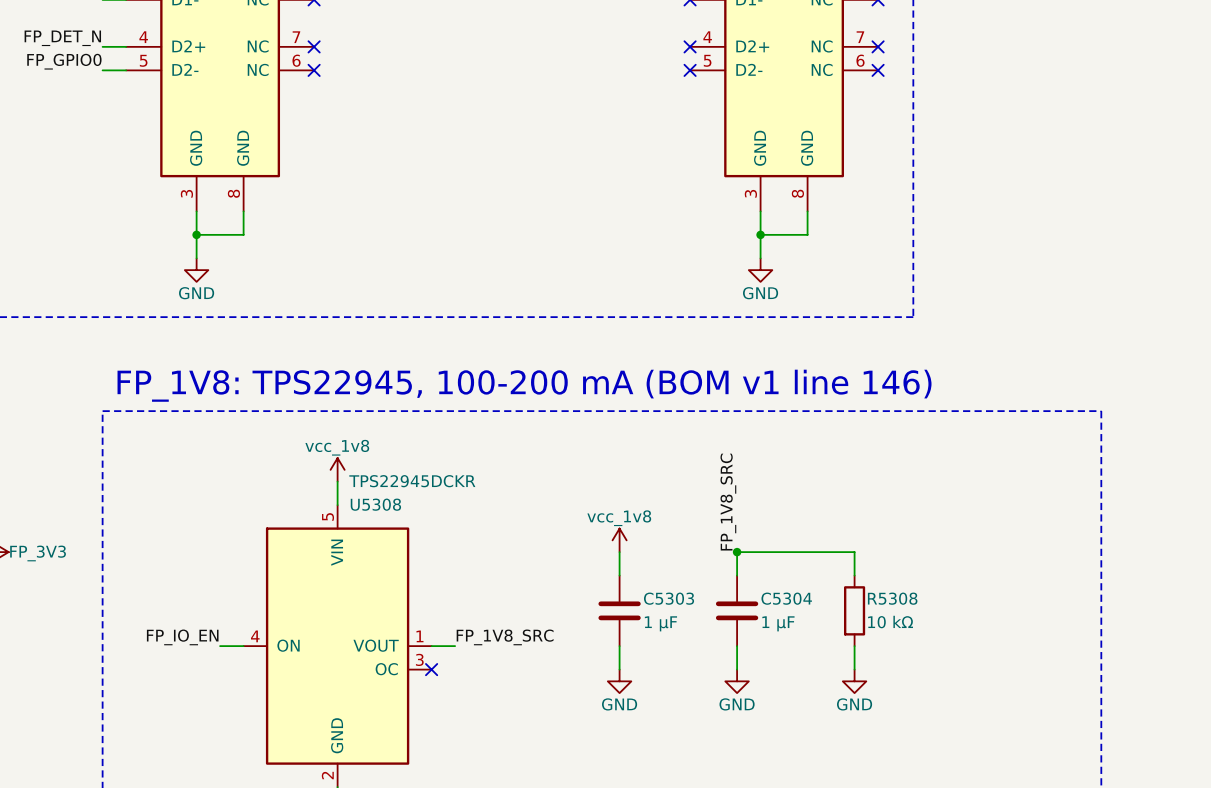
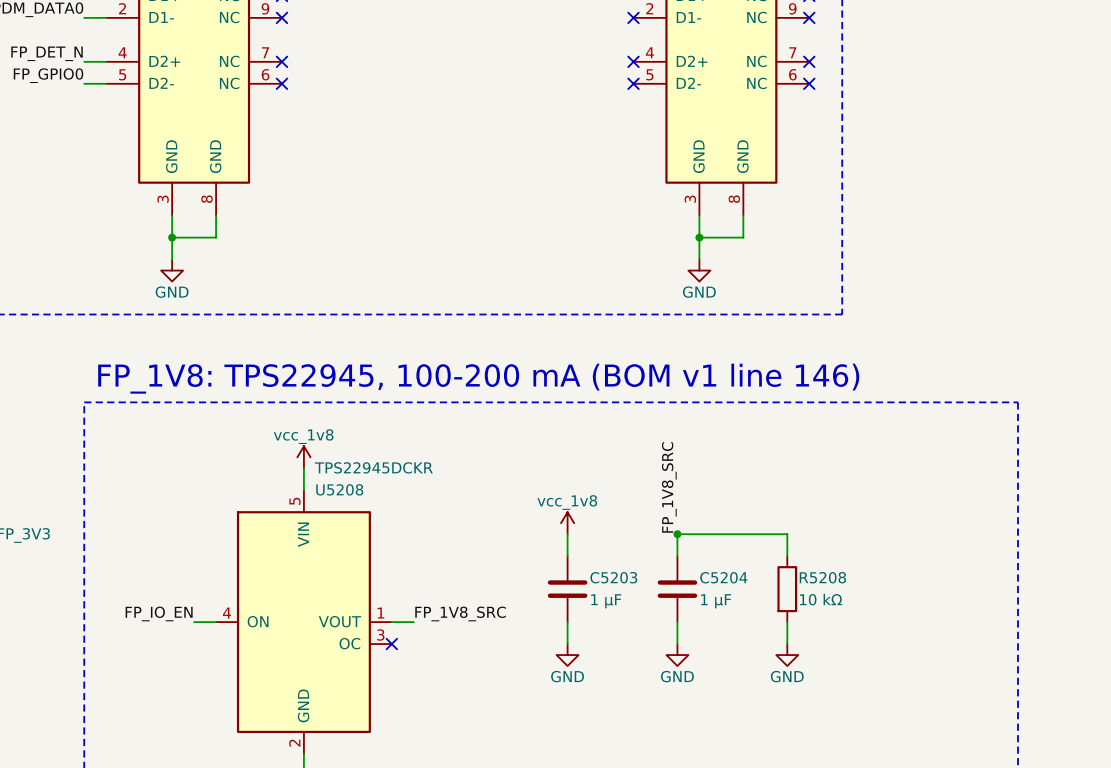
U5308 name: U5308 (375, 504) -> U5208 (339, 489)
C5303 name: C5303 (669, 598) -> C5203 (613, 577)
C5304 name: C5304 (786, 598) -> C5204 (723, 577)
R5308 name: R5308 (892, 598) -> R5208 (822, 577)

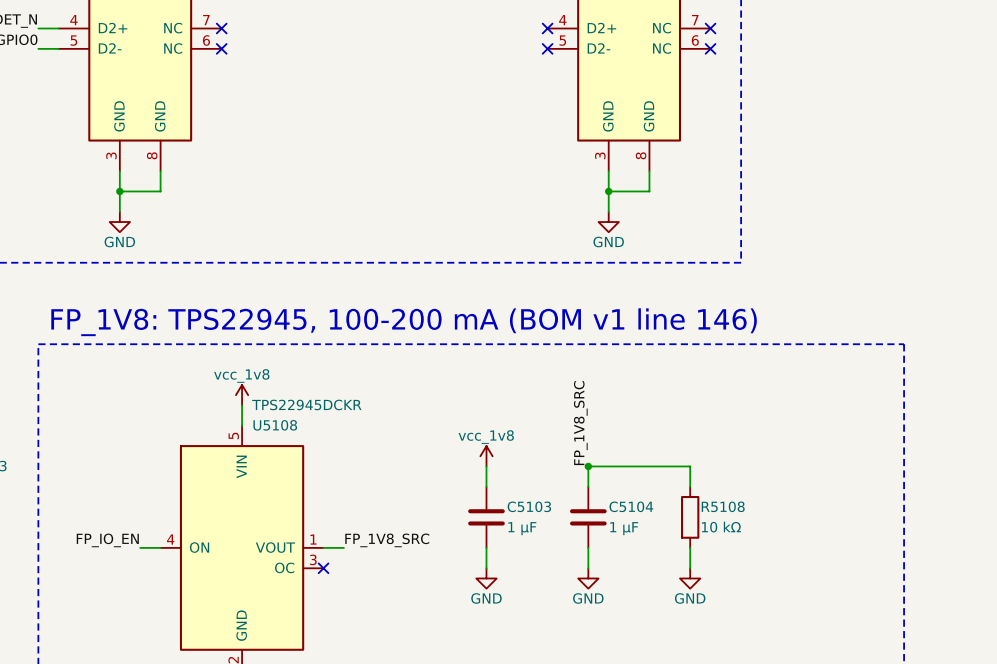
U5208 name: U5208 (339, 489) -> U5108 (275, 425)
C5203 name: C5203 (613, 577) -> C5103 (529, 506)
C5204 name: C5204 (723, 577) -> C5104 (631, 506)
R5208 name: R5208 (822, 577) -> R5108 (723, 506)

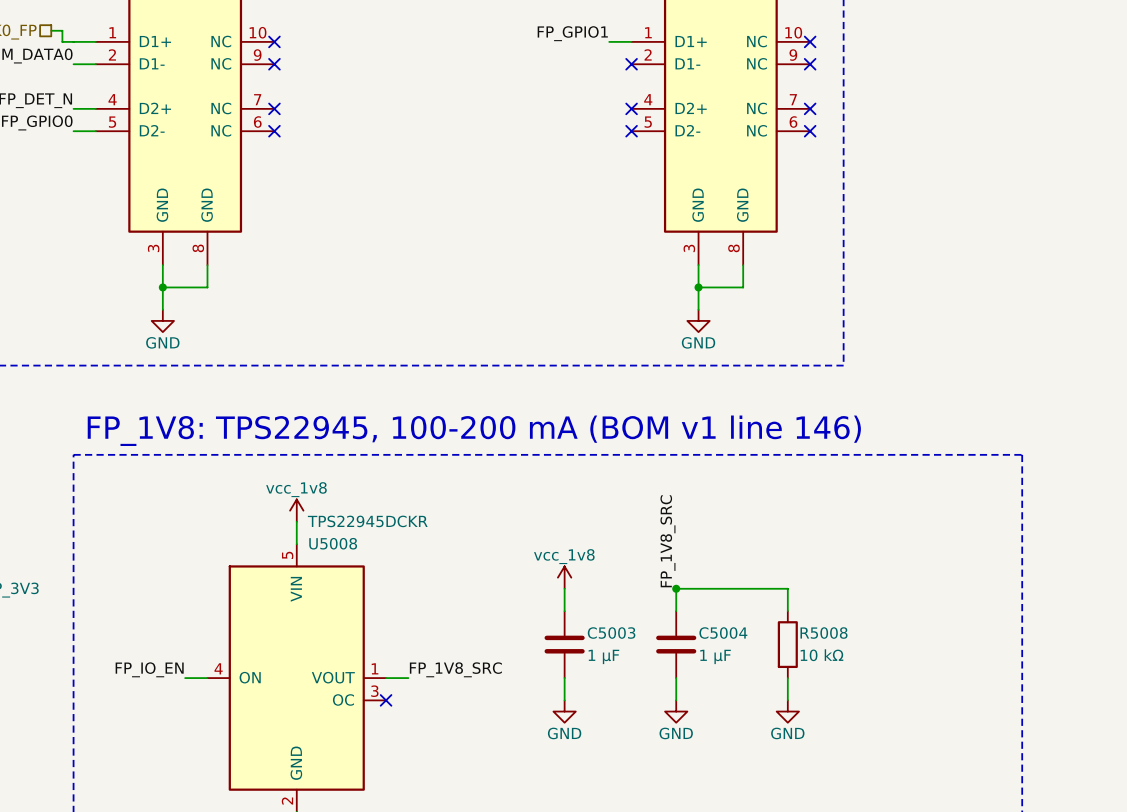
U5108 name: U5108 (275, 425) -> U5008 (333, 543)
C5103 name: C5103 (529, 506) -> C5003 (611, 633)
C5104 name: C5104 (631, 506) -> C5004 (723, 633)
R5108 name: R5108 (723, 506) -> R5008 (824, 633)

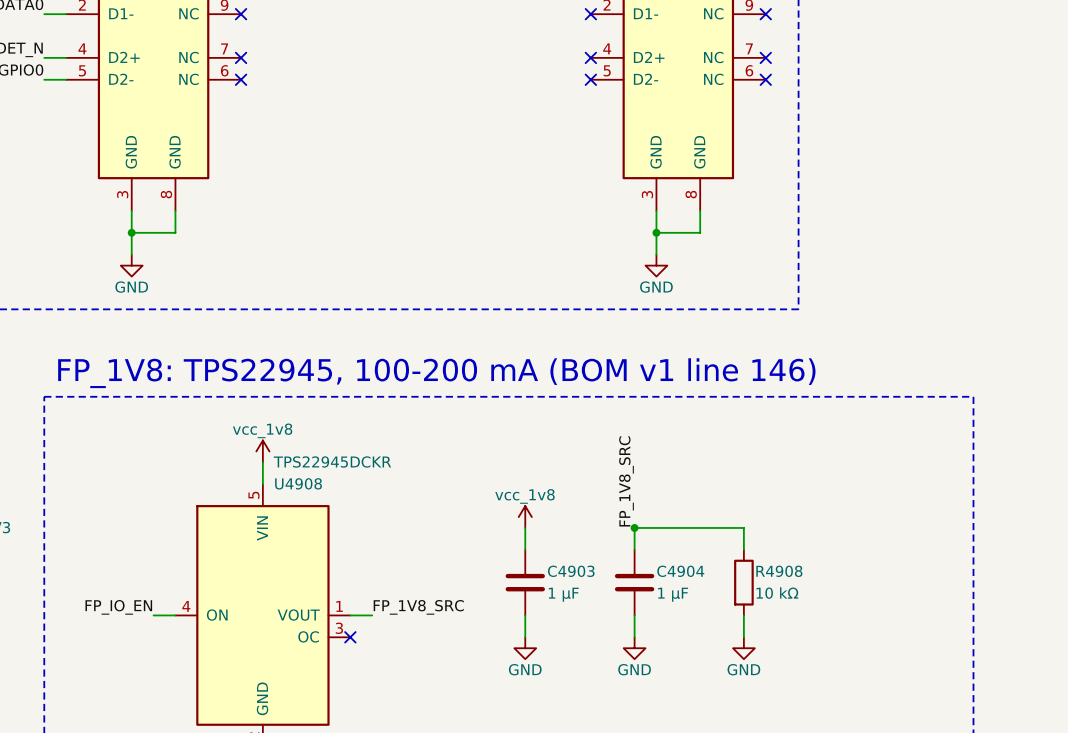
U5008 name: U5008 (333, 543) -> U4908 (298, 483)
C5003 name: C5003 (611, 633) -> C4903 (571, 571)
C5004 name: C5004 (723, 633) -> C4904 (680, 571)
R5008 name: R5008 (824, 633) -> R4908 (779, 571)

